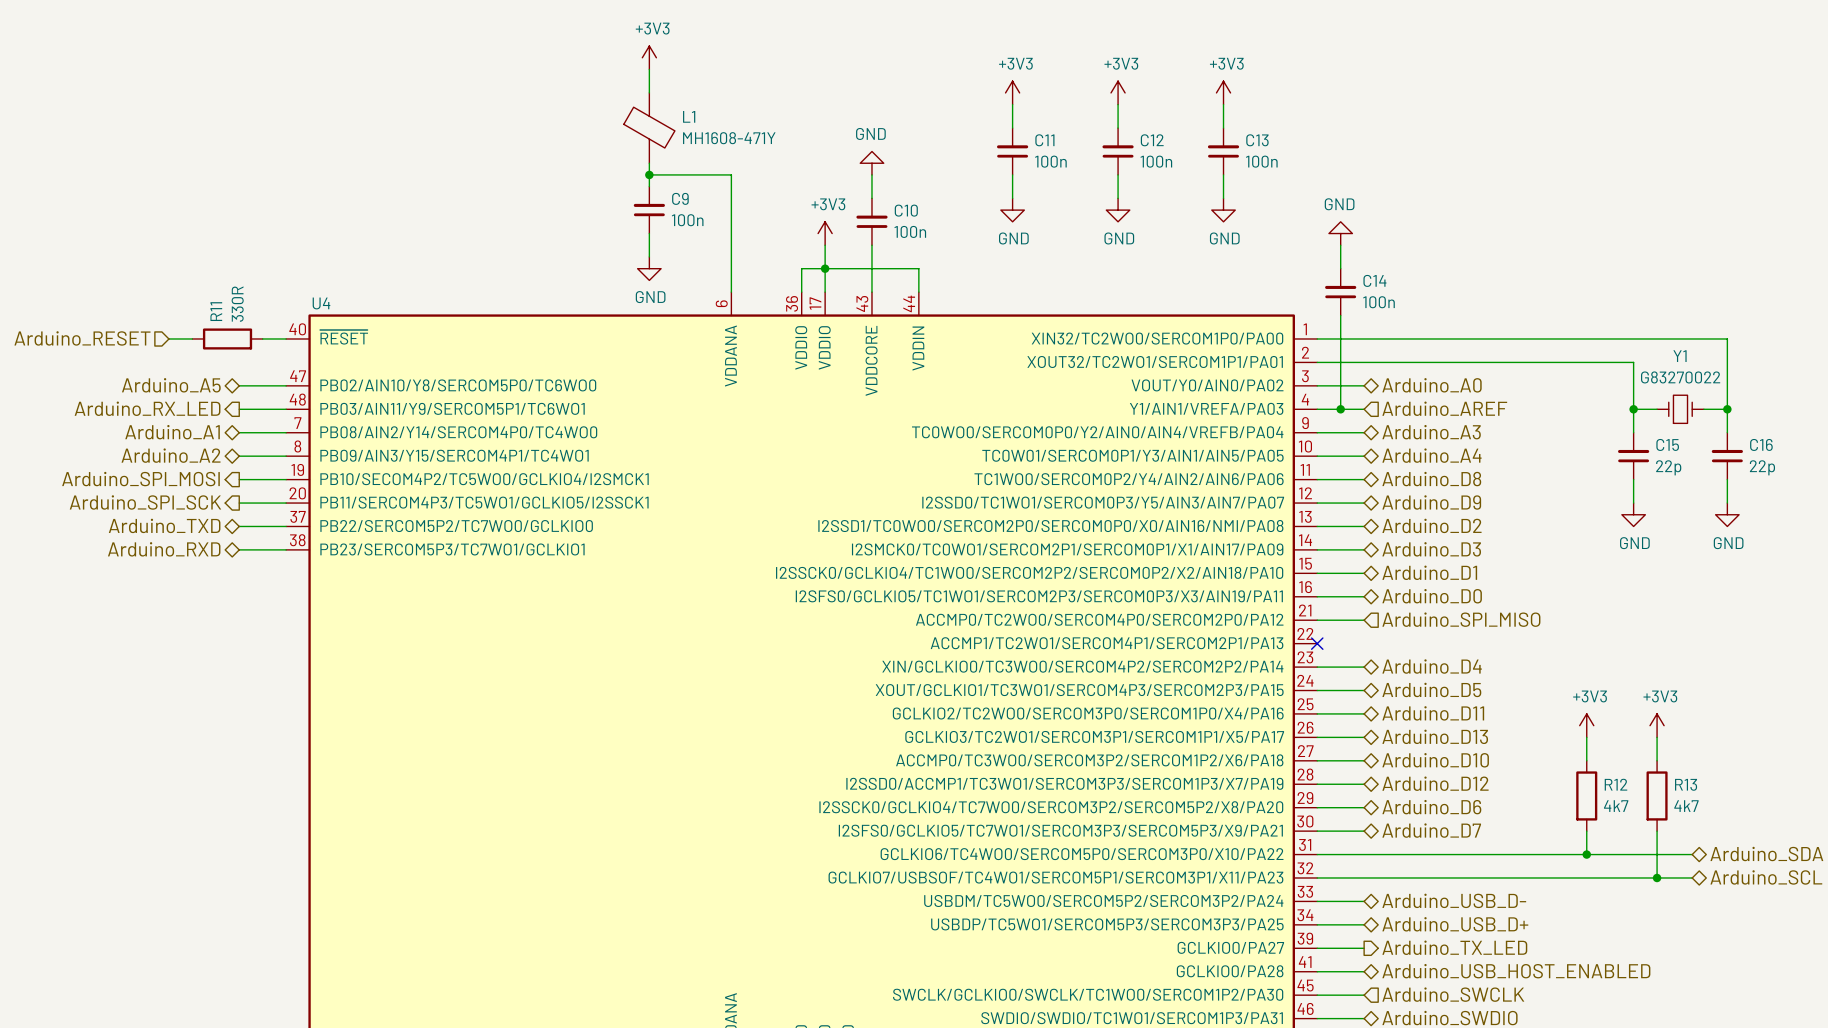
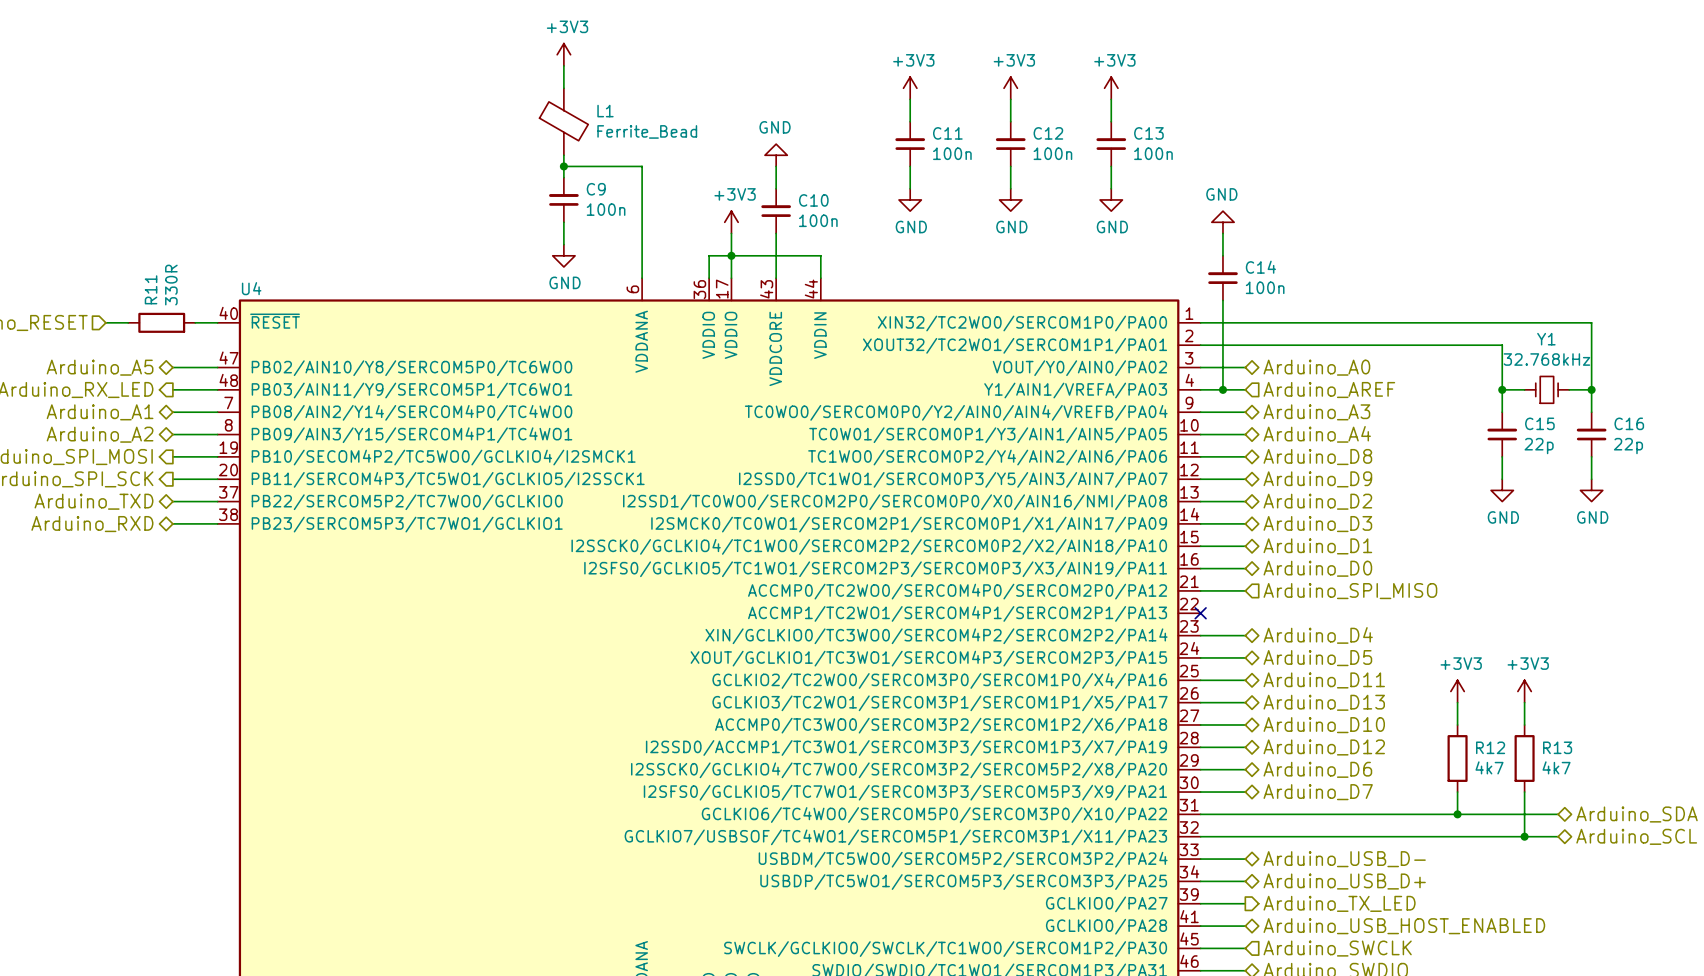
L1 value: MH1608-471Y (729, 138) -> Ferrite_Bead (647, 131)
Y1 value: G83270022 (1680, 377) -> 32.768kHz (1546, 359)

